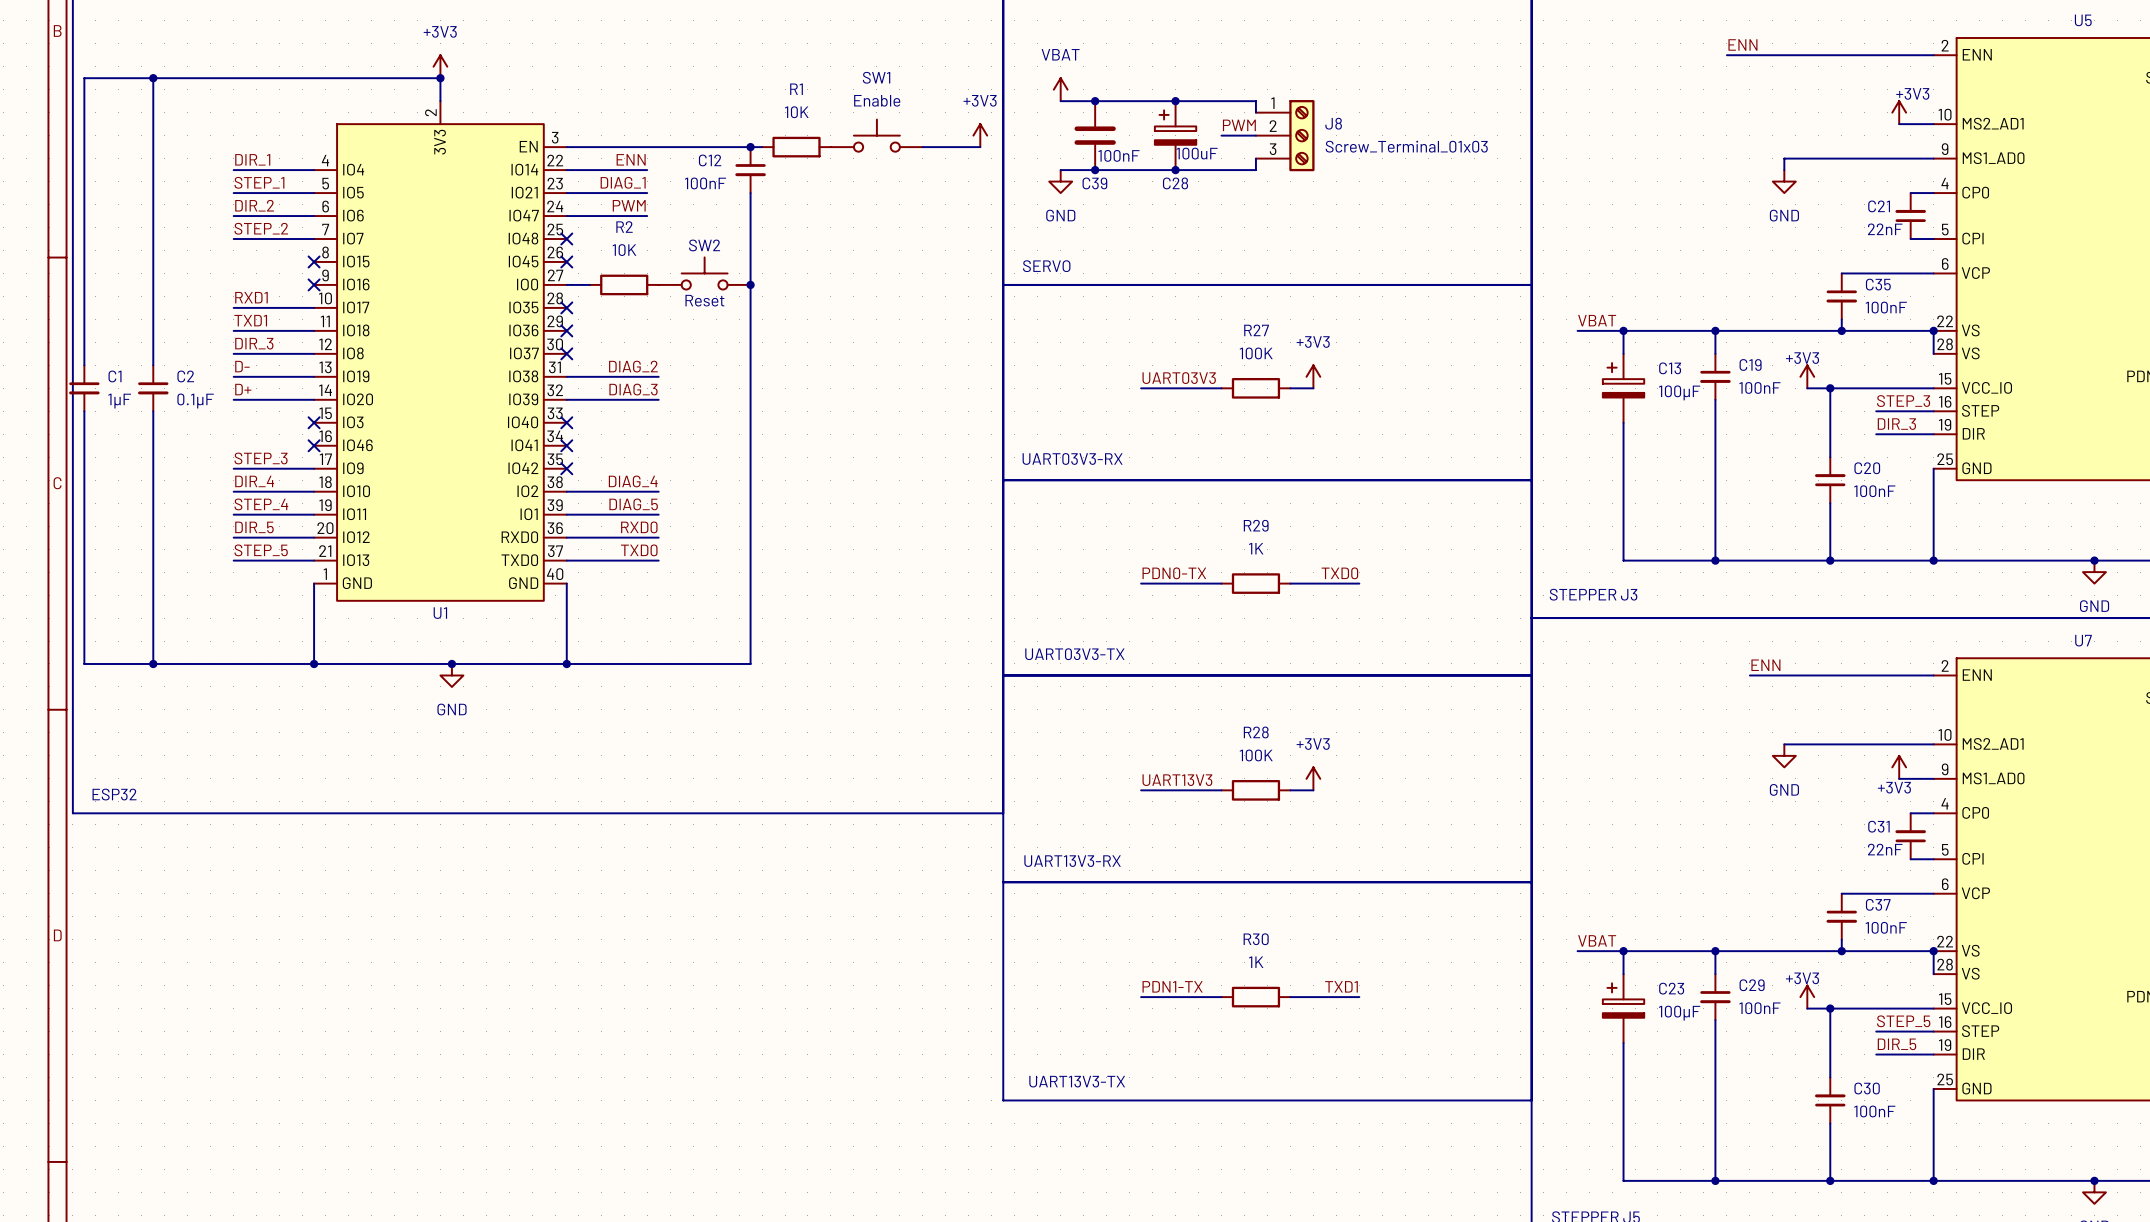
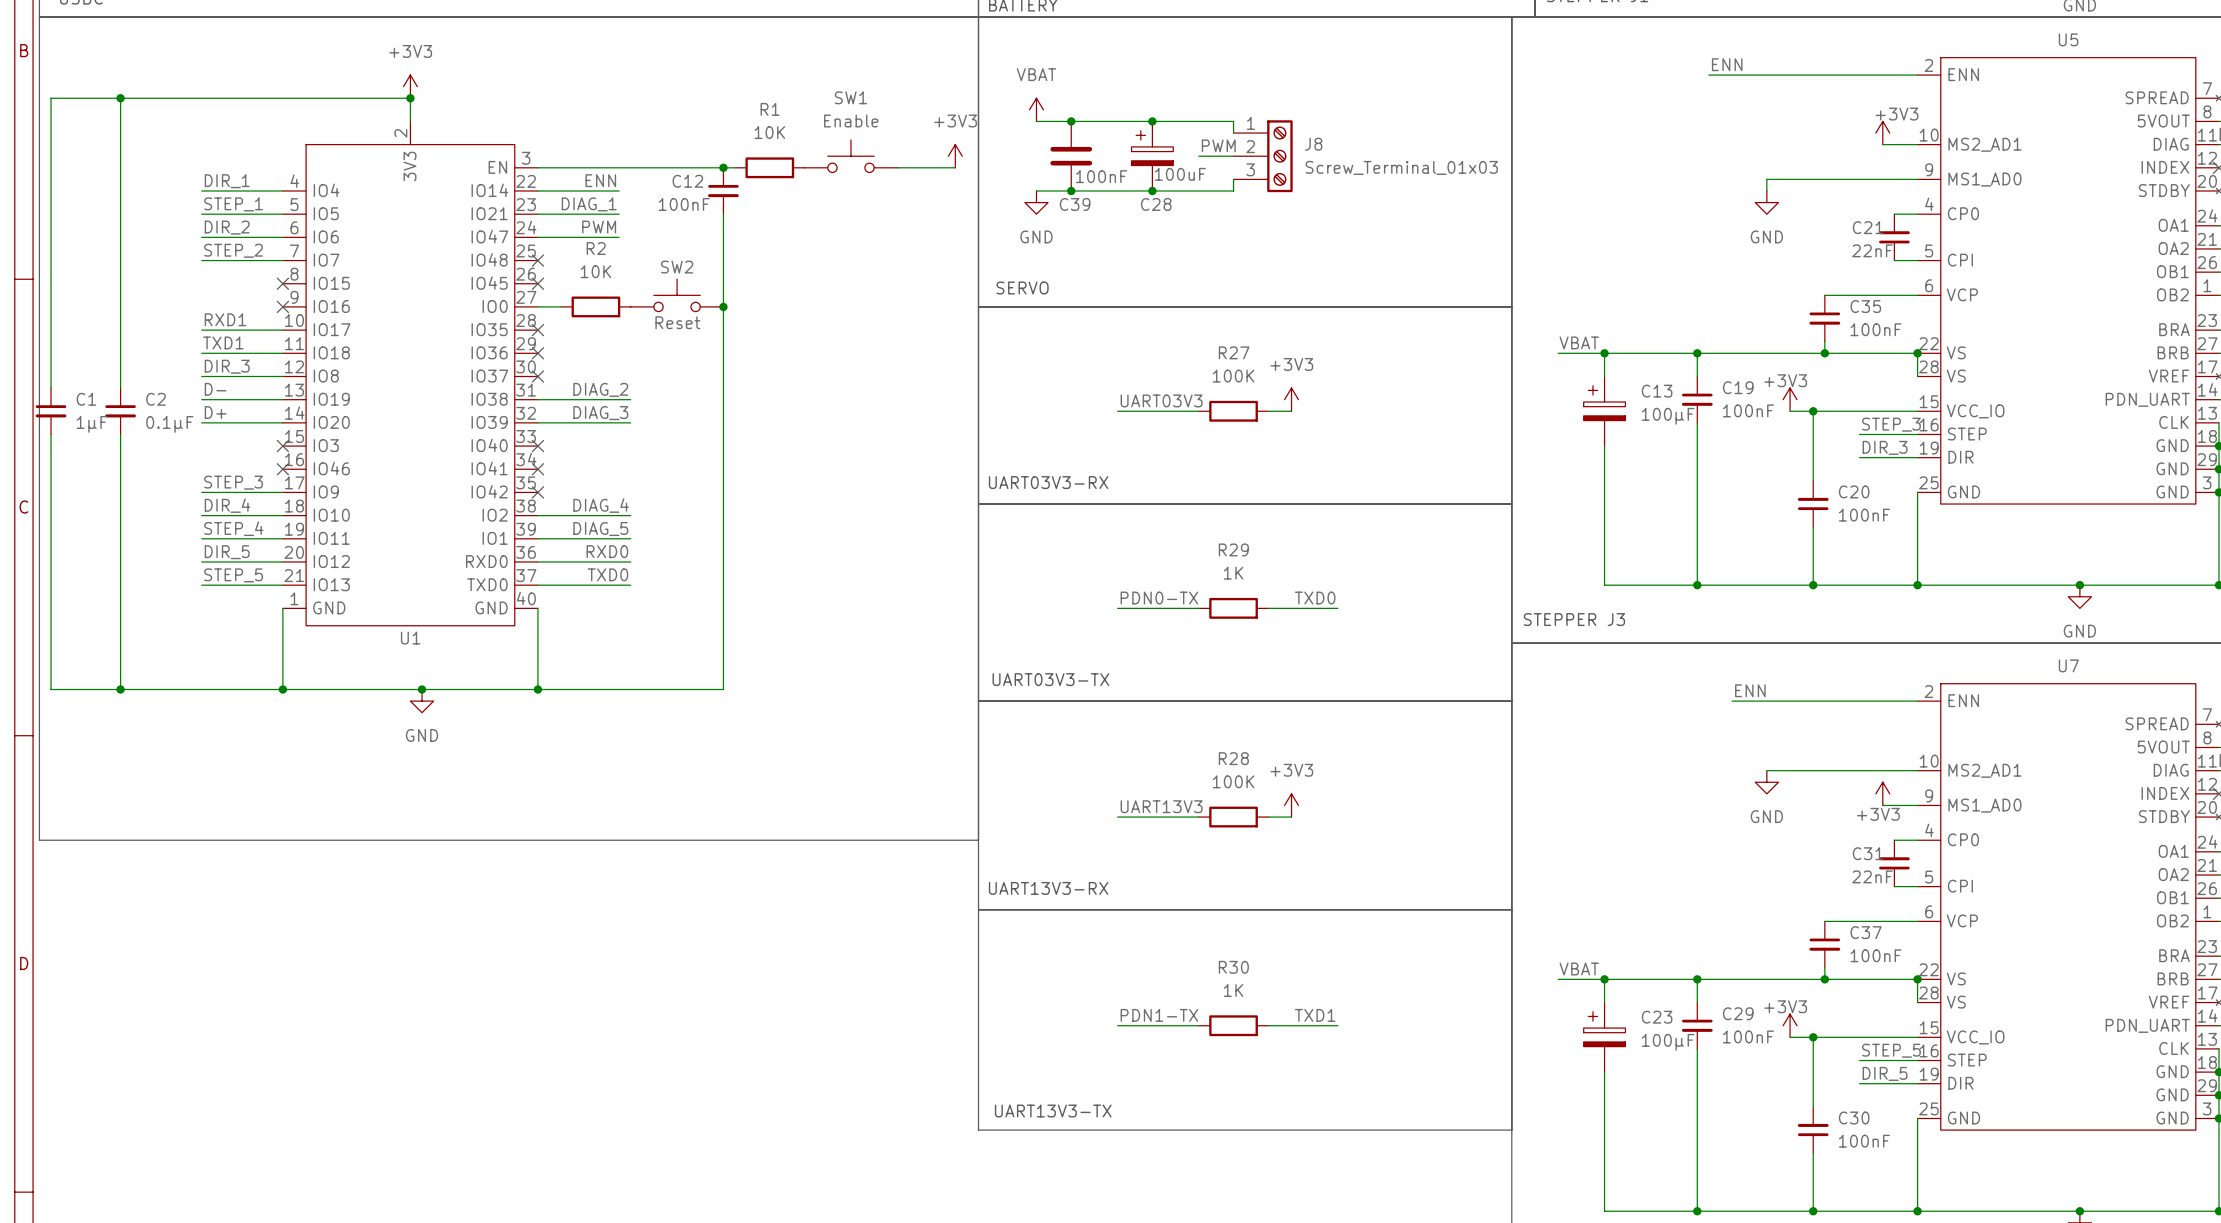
text: ESP32 (114, 794) -> none

